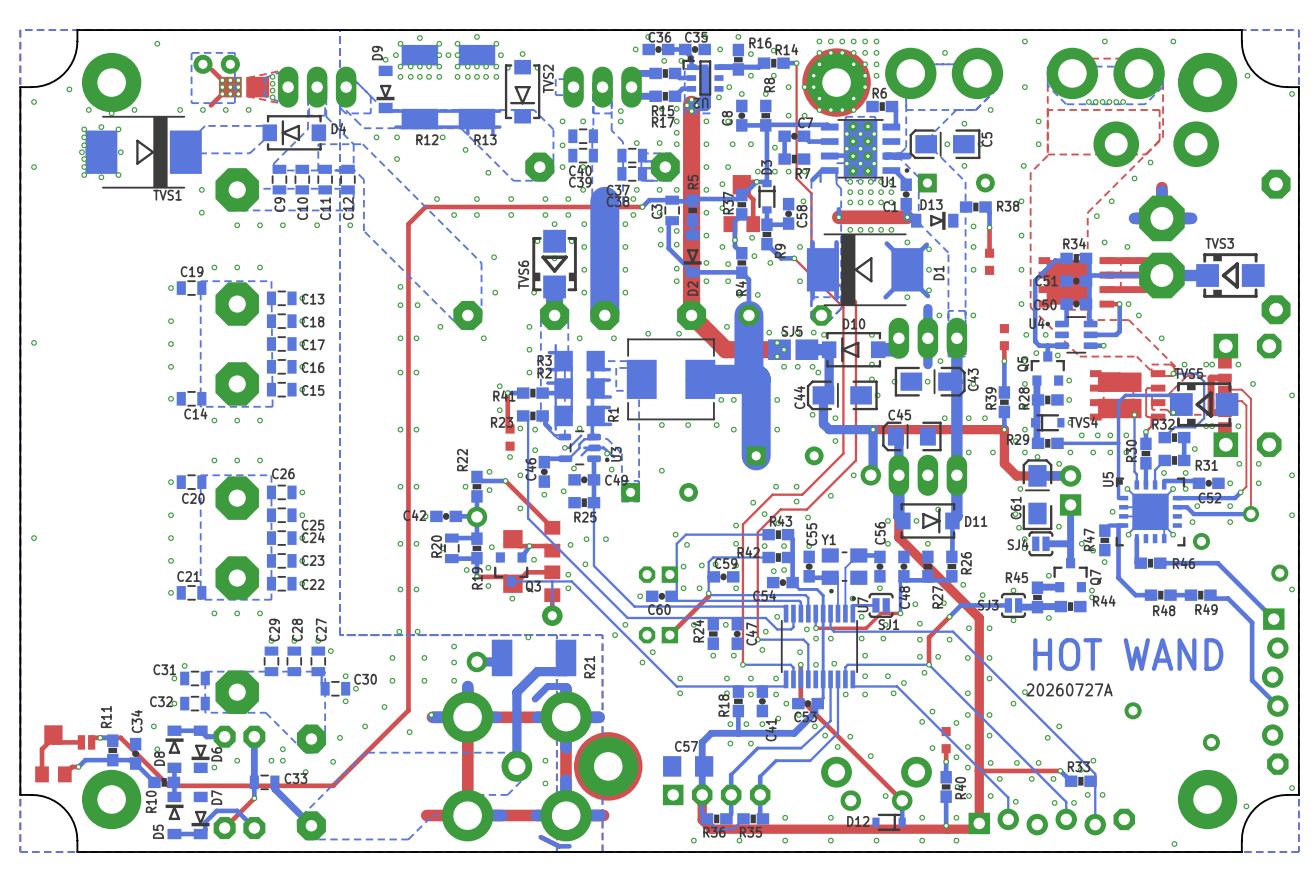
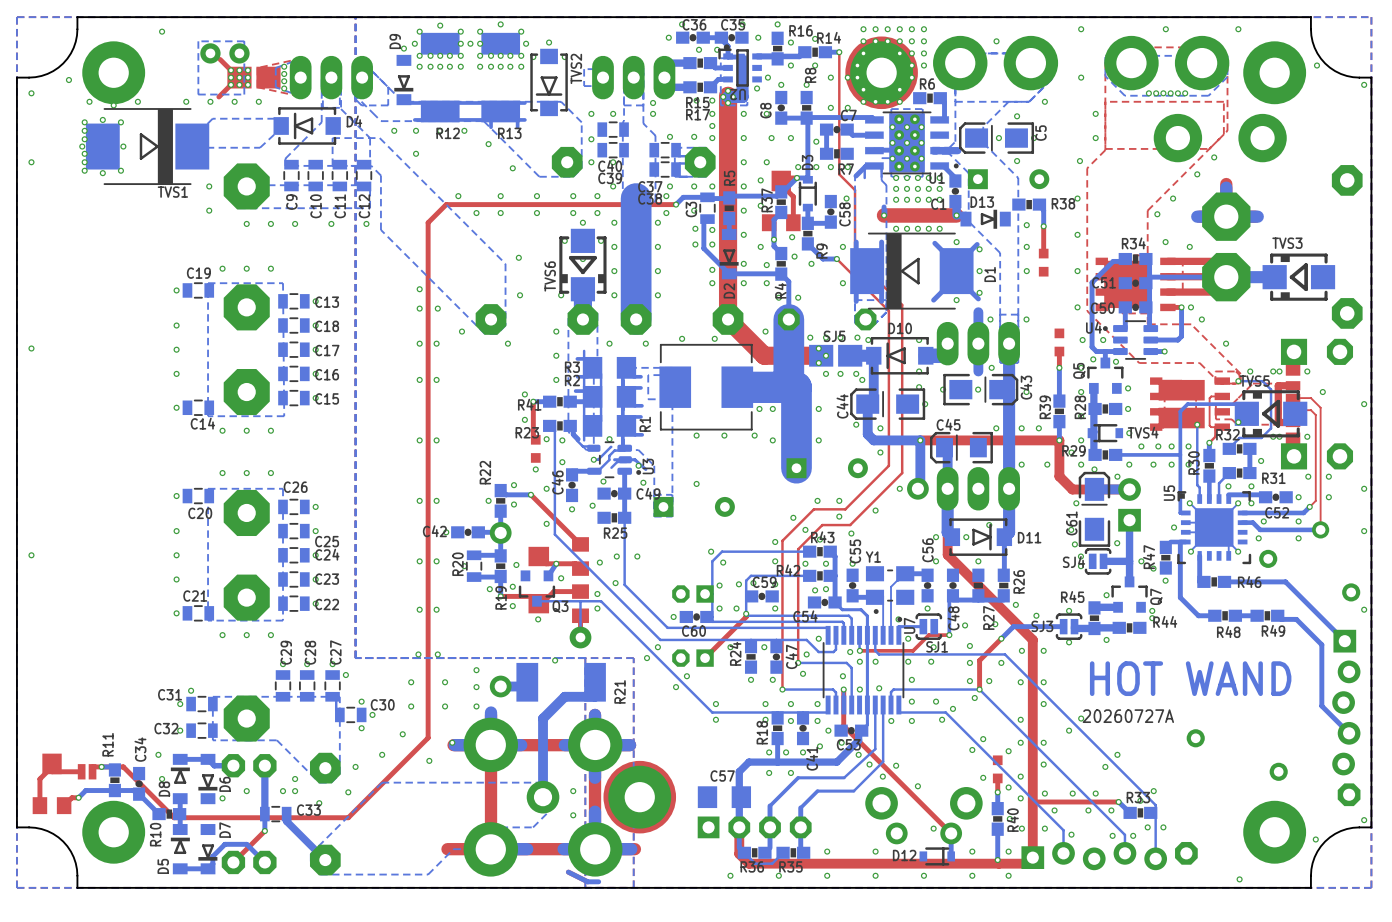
bottom track: (566, 686) (547, 686) (535, 699) -> none

